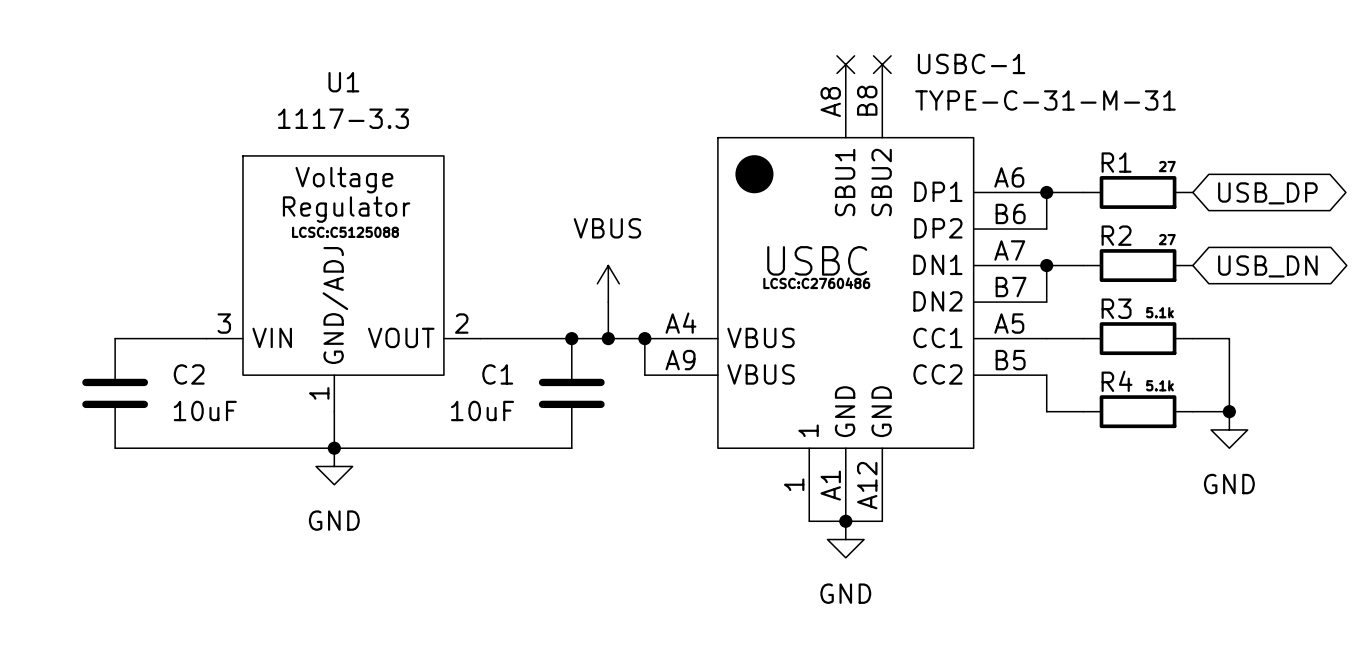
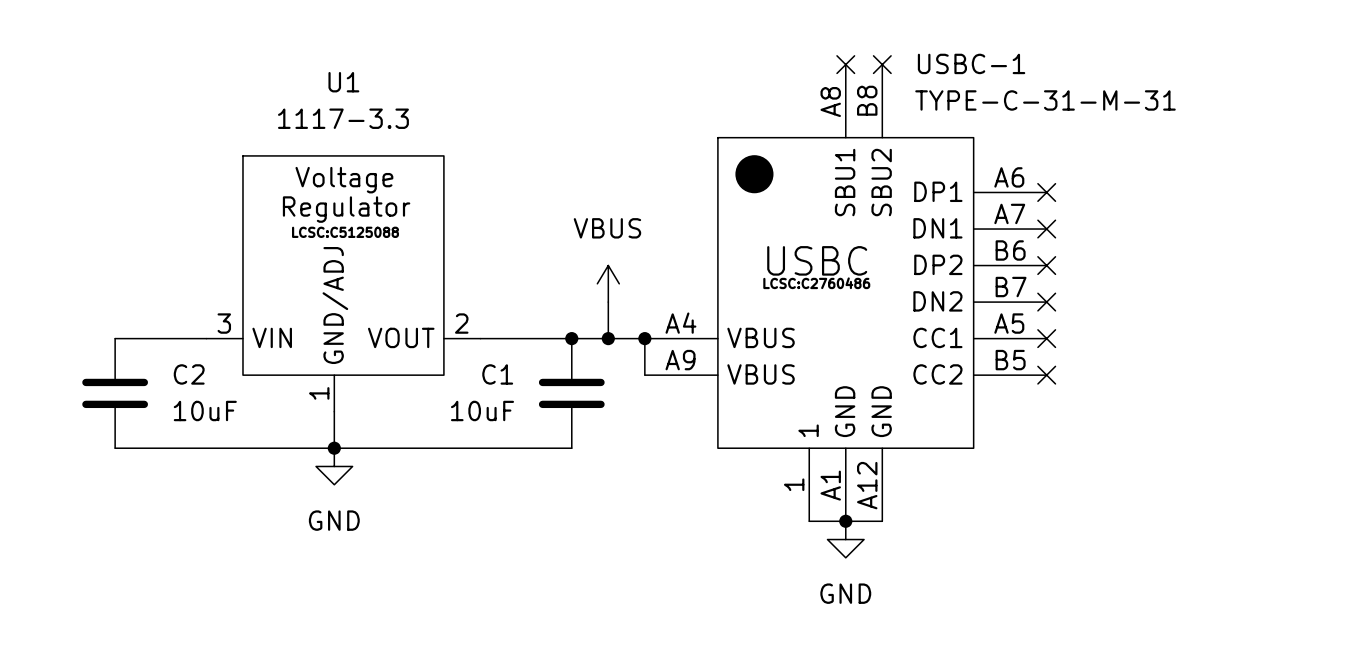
junction: (1046, 192) -> none
no-connect mark: none -> (1046, 192)
wire: (1083, 192) (1046, 192) (1046, 229) -> none
R1: 27 (1138, 192) -> none
global label: USB_DP (1267, 193) -> none
USBC-1 pin number: B6 (1010, 213) -> A7 (1009, 213)
USBC-1 pin name: DP2 (938, 228) -> DN1 (937, 228)
no-connect mark: none -> (1046, 229)
USBC-1 pin number: A7 (1009, 250) -> B6 (1010, 250)
USBC-1 pin name: DN1 (937, 264) -> DP2 (938, 264)
junction: (1046, 265) -> none
no-connect mark: none -> (1046, 265)
wire: (1083, 265) (1046, 265) (1046, 302) -> none
R2: 27 (1138, 265) -> none
global label: USB_DN (1267, 266) -> none
no-connect mark: none -> (1046, 302)
wire: (1046, 338) (1083, 338) -> none
no-connect mark: none -> (1046, 338)
R3: 5.1k (1138, 338) -> none
wire: (1192, 338) (1229, 338) (1229, 411) (1192, 411) -> none
wire: (1046, 375) (1046, 411) (1083, 411) -> none
no-connect mark: none -> (1046, 375)
R4: 5.1k (1138, 411) -> none
junction: (1229, 411) -> none
power symbol: GND (1229, 429) -> none

